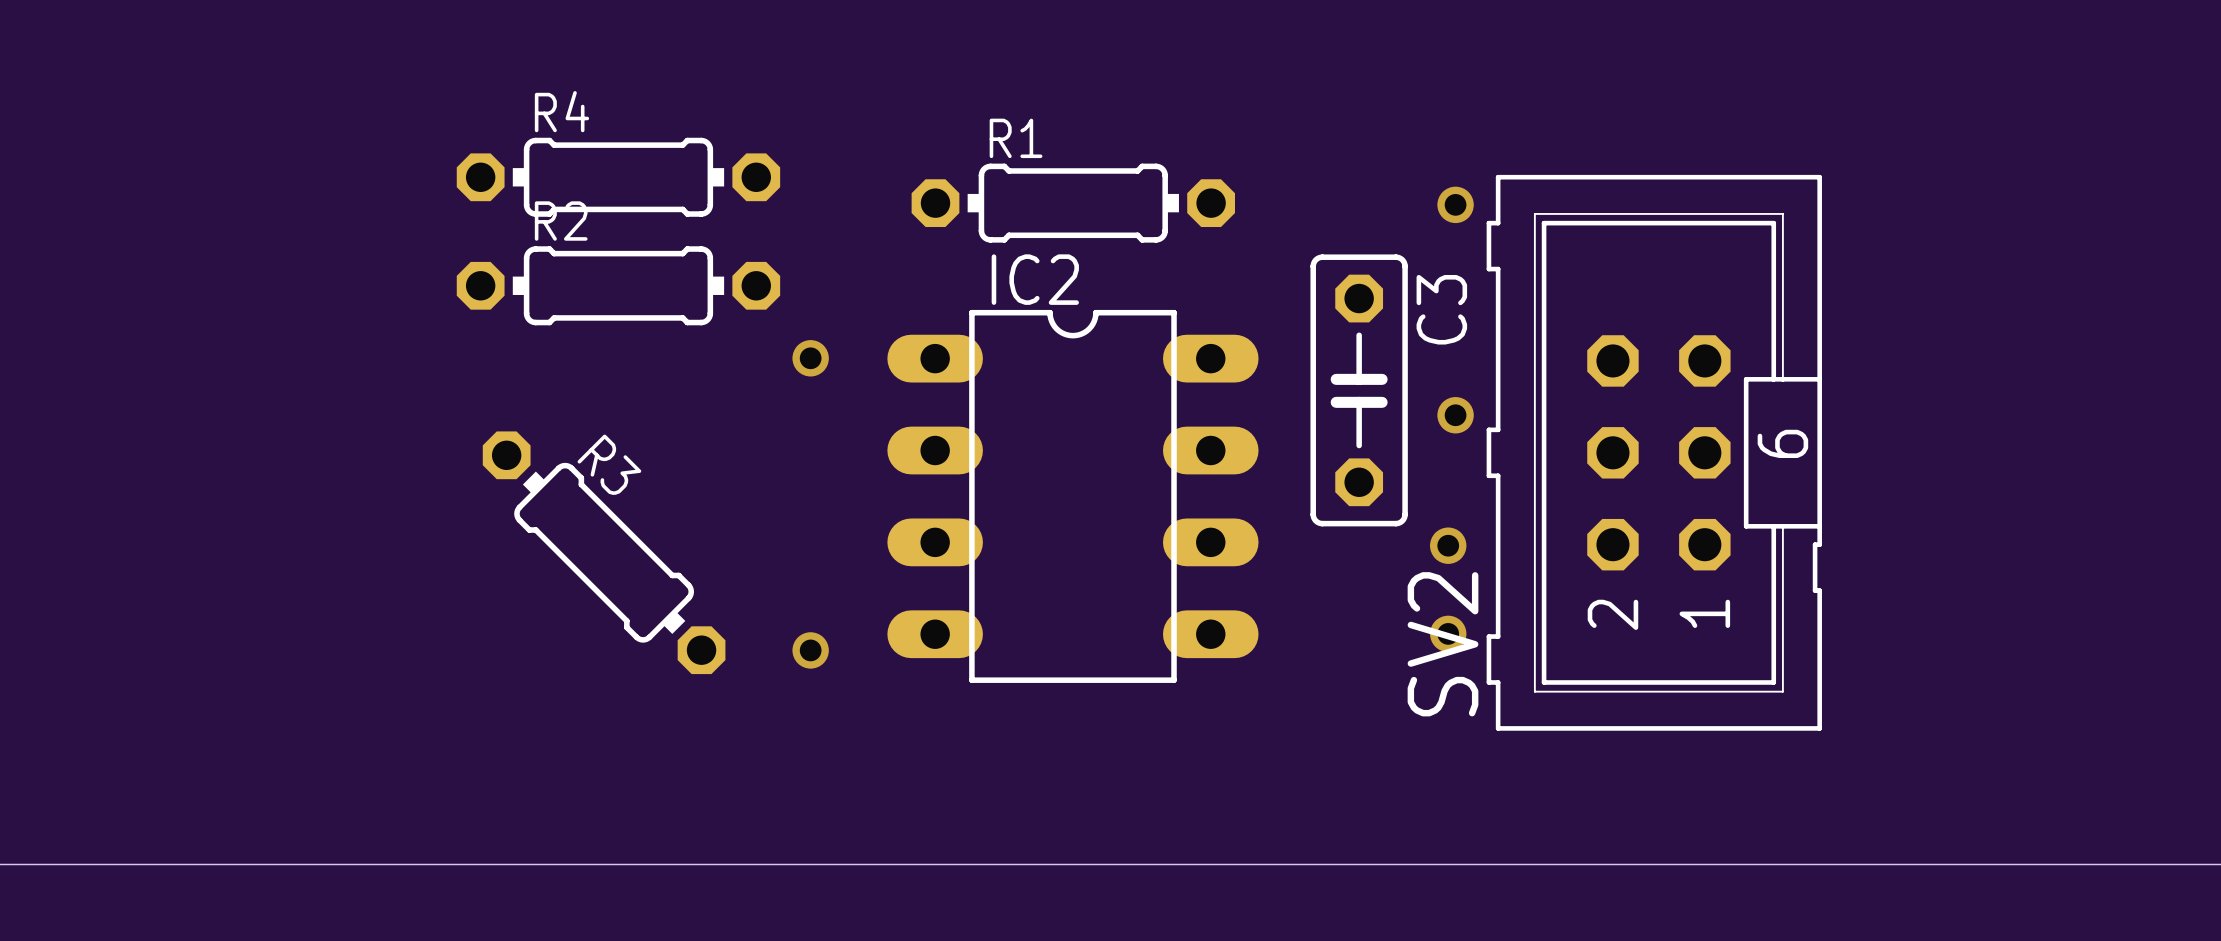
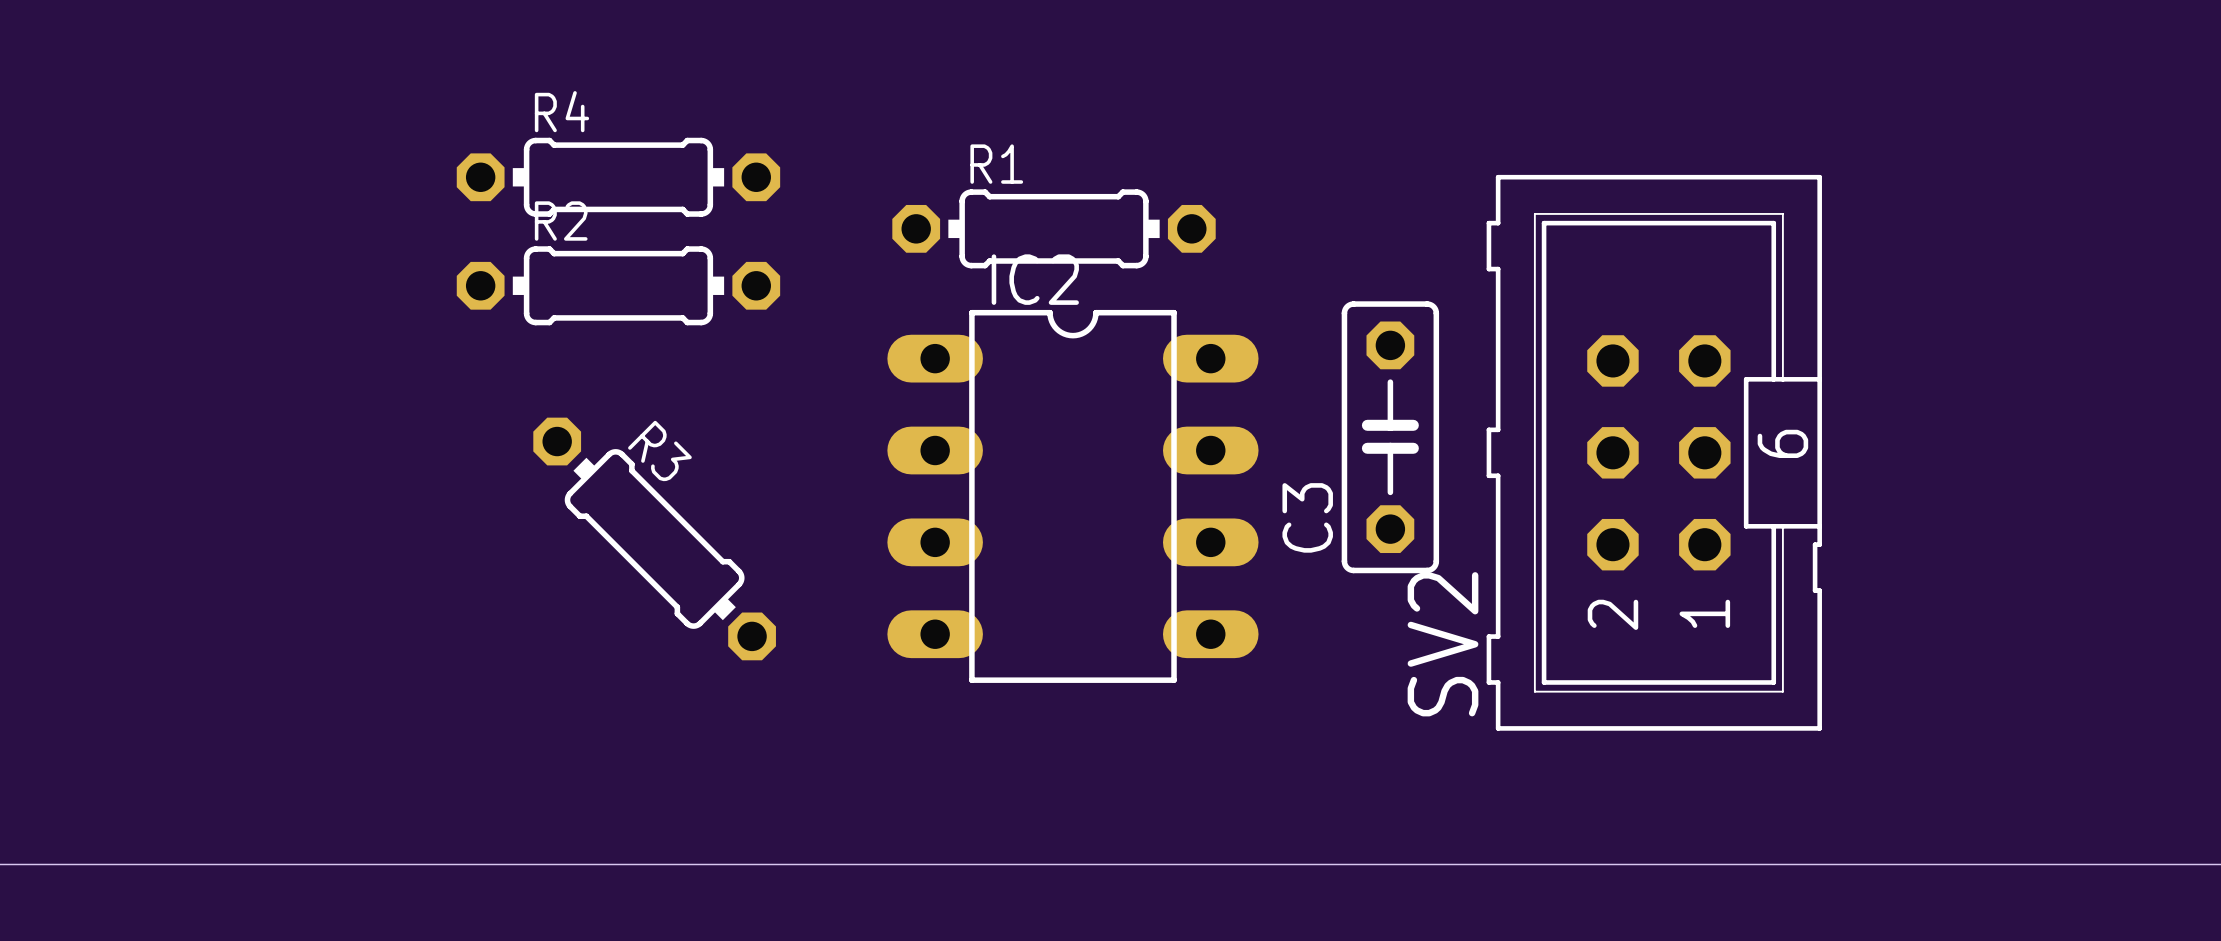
R1 position: (1073, 203) -> (1054, 228)
via: (1455, 204) -> none
via: (810, 358) -> none
C3 rotation: 0° (1359, 390) -> 180° (1390, 437)
via: (1455, 415) -> none
via: (1448, 545) -> none
R3 position: (604, 552) -> (654, 538)
via: (1448, 633) -> none
via: (810, 650) -> none

